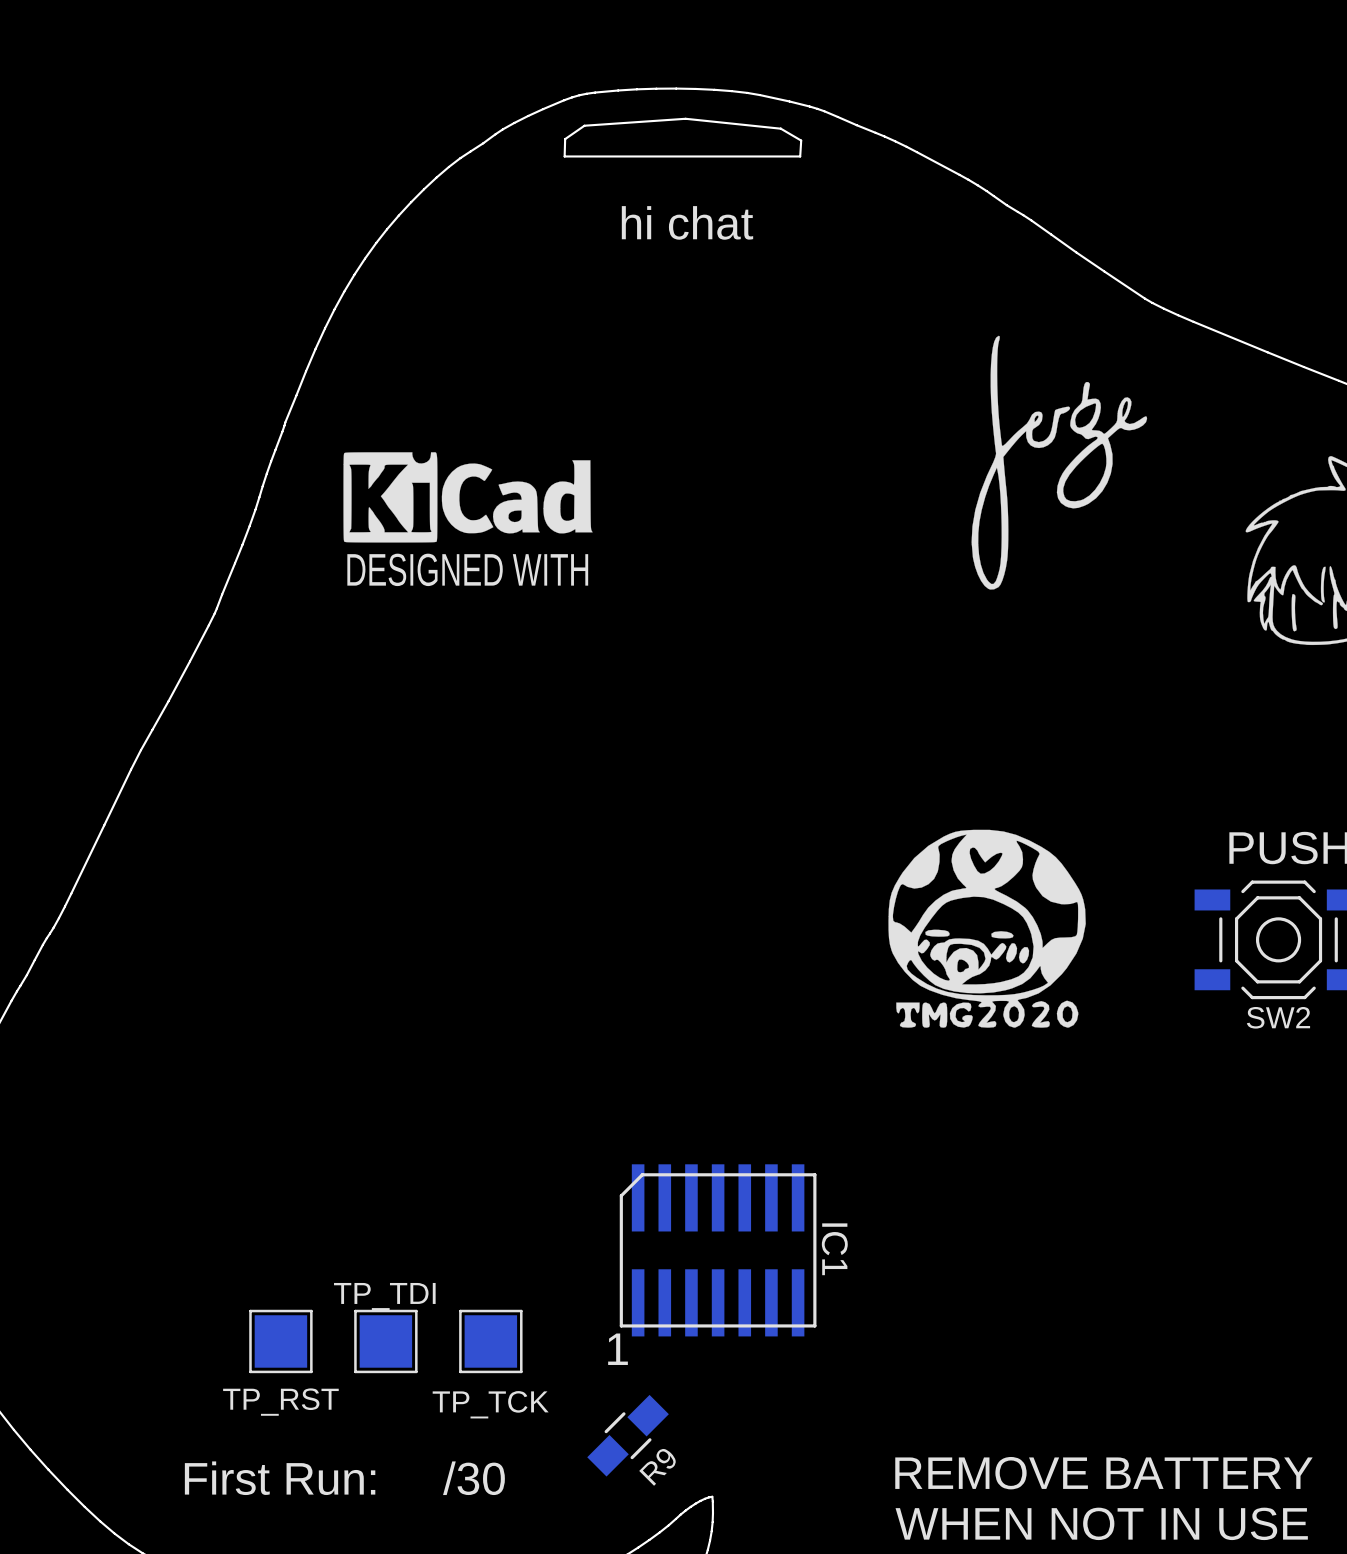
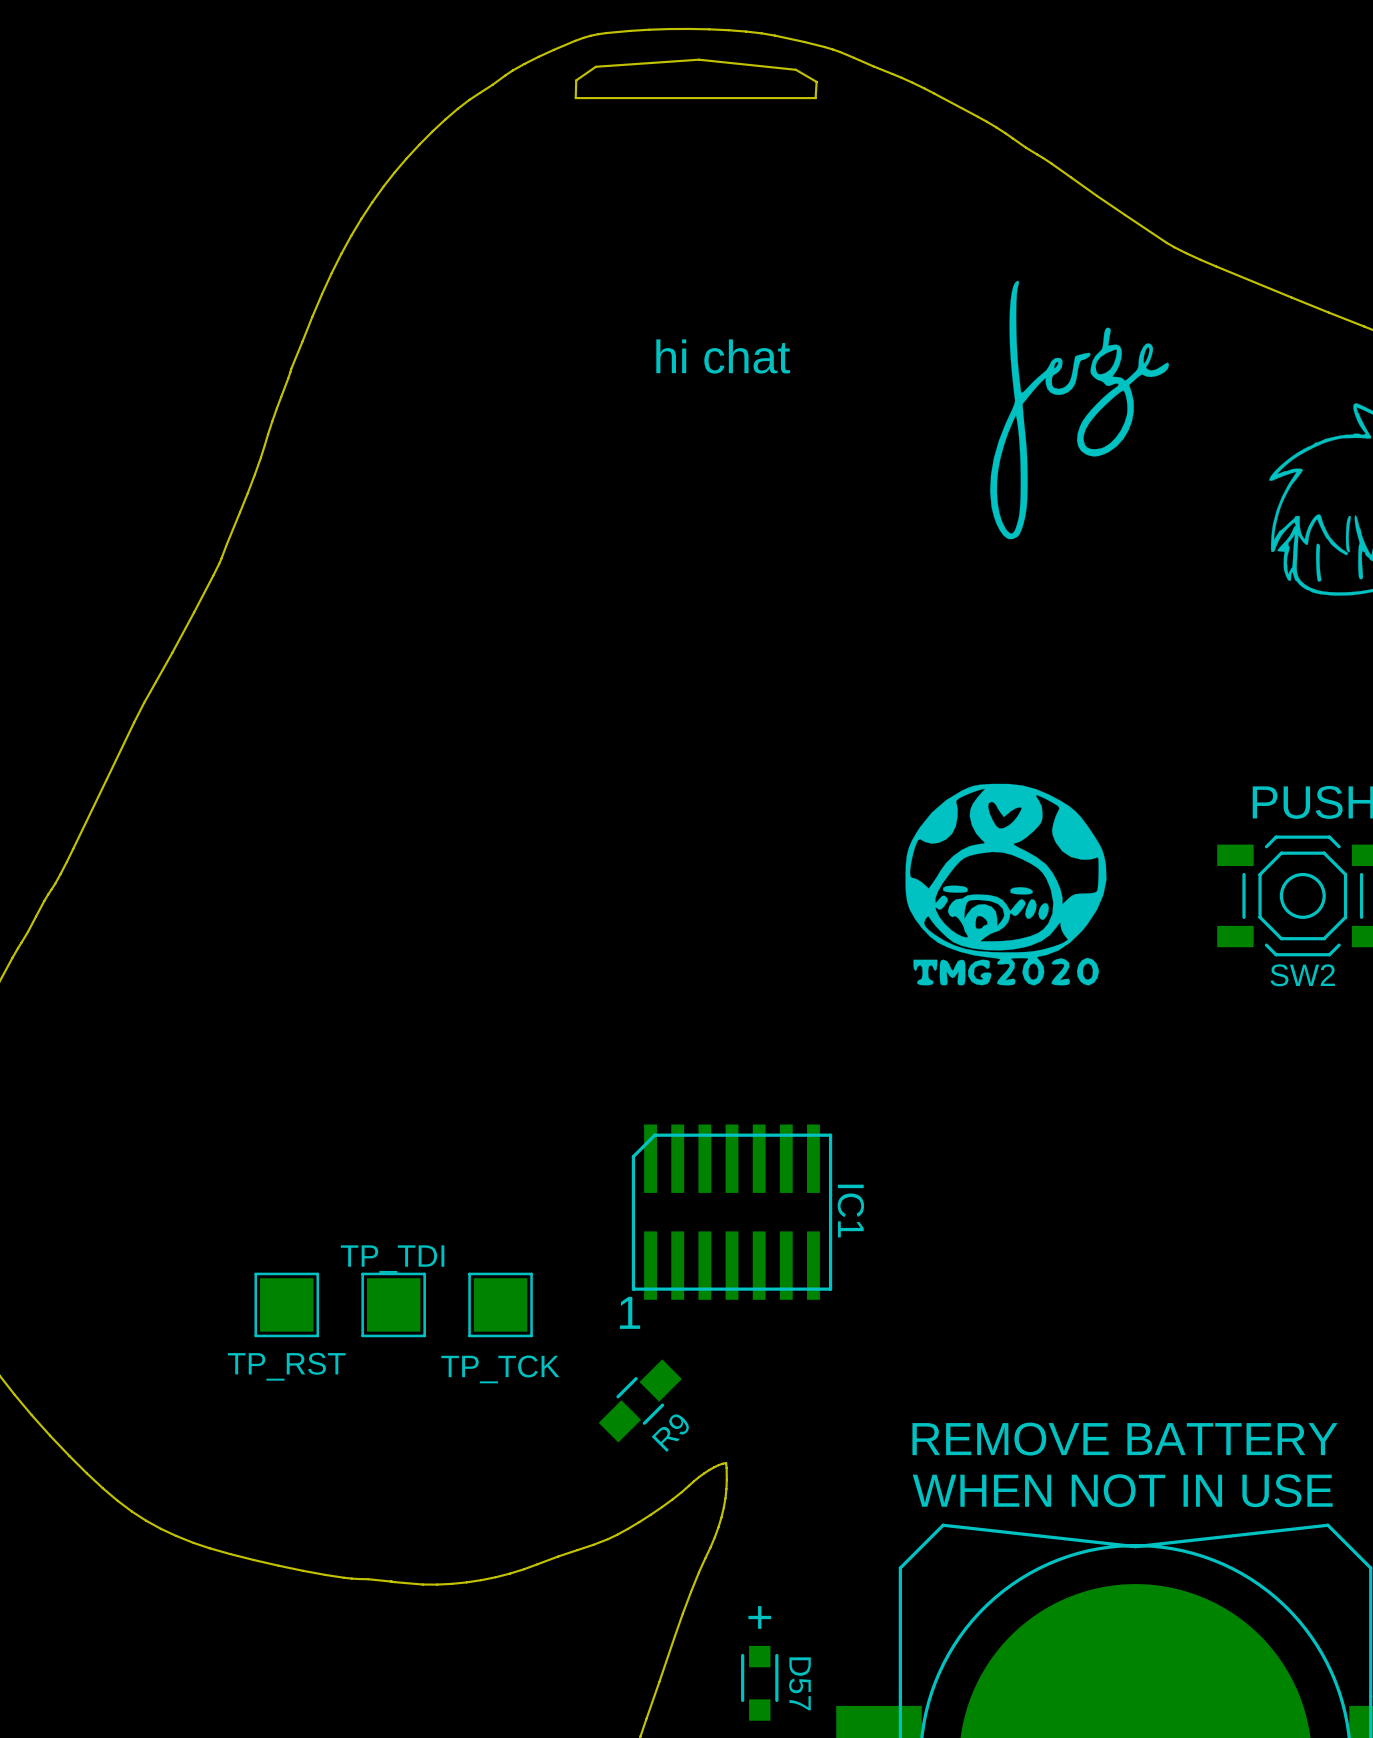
text position: hi chat (687, 222) -> hi chat (723, 356)
drawing: [343, 452, 593, 543] -> none
text: DESIGNED WITH (467, 569) -> none
text: First Run: /30 (344, 1478) -> none

